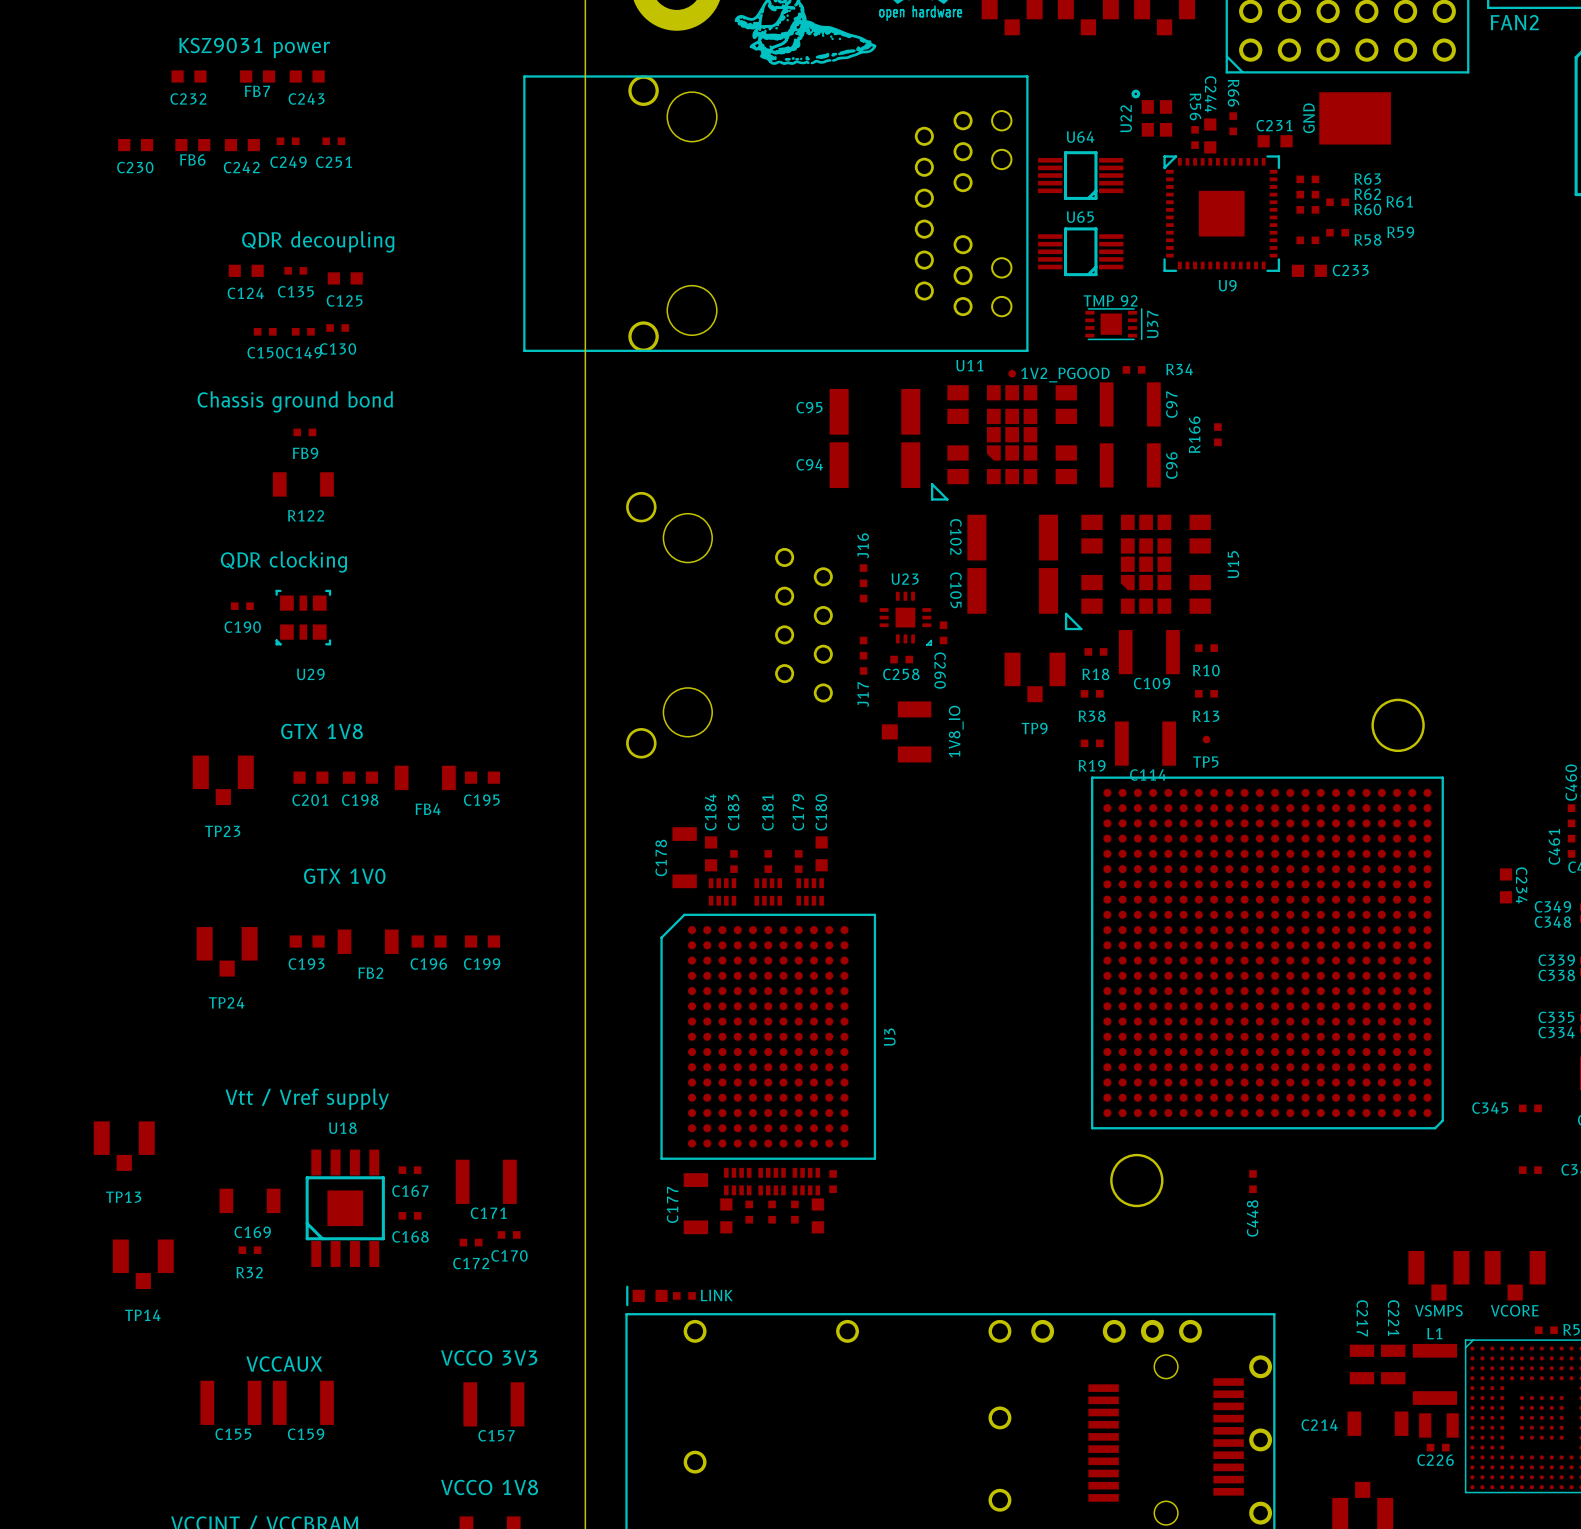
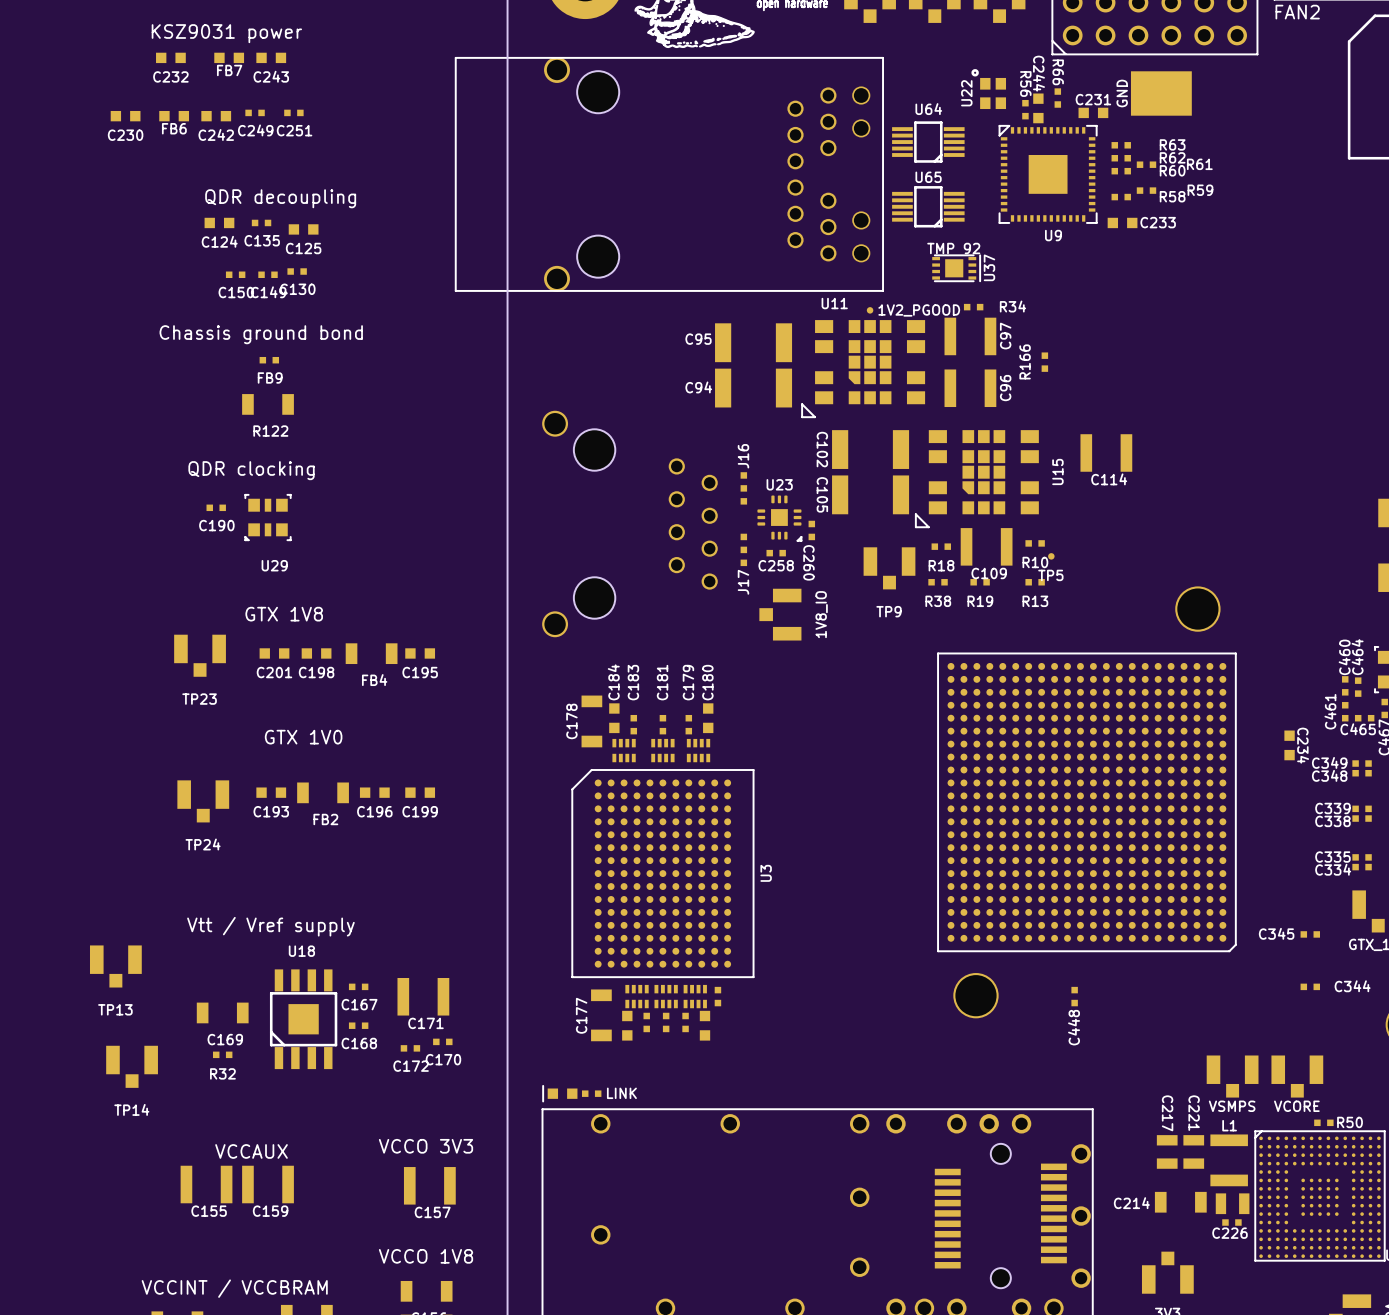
TP5 position: (1206, 739) -> (1051, 556)
R19 position: (1092, 743) -> (980, 582)
C114 position: (1145, 743) -> (1106, 452)

